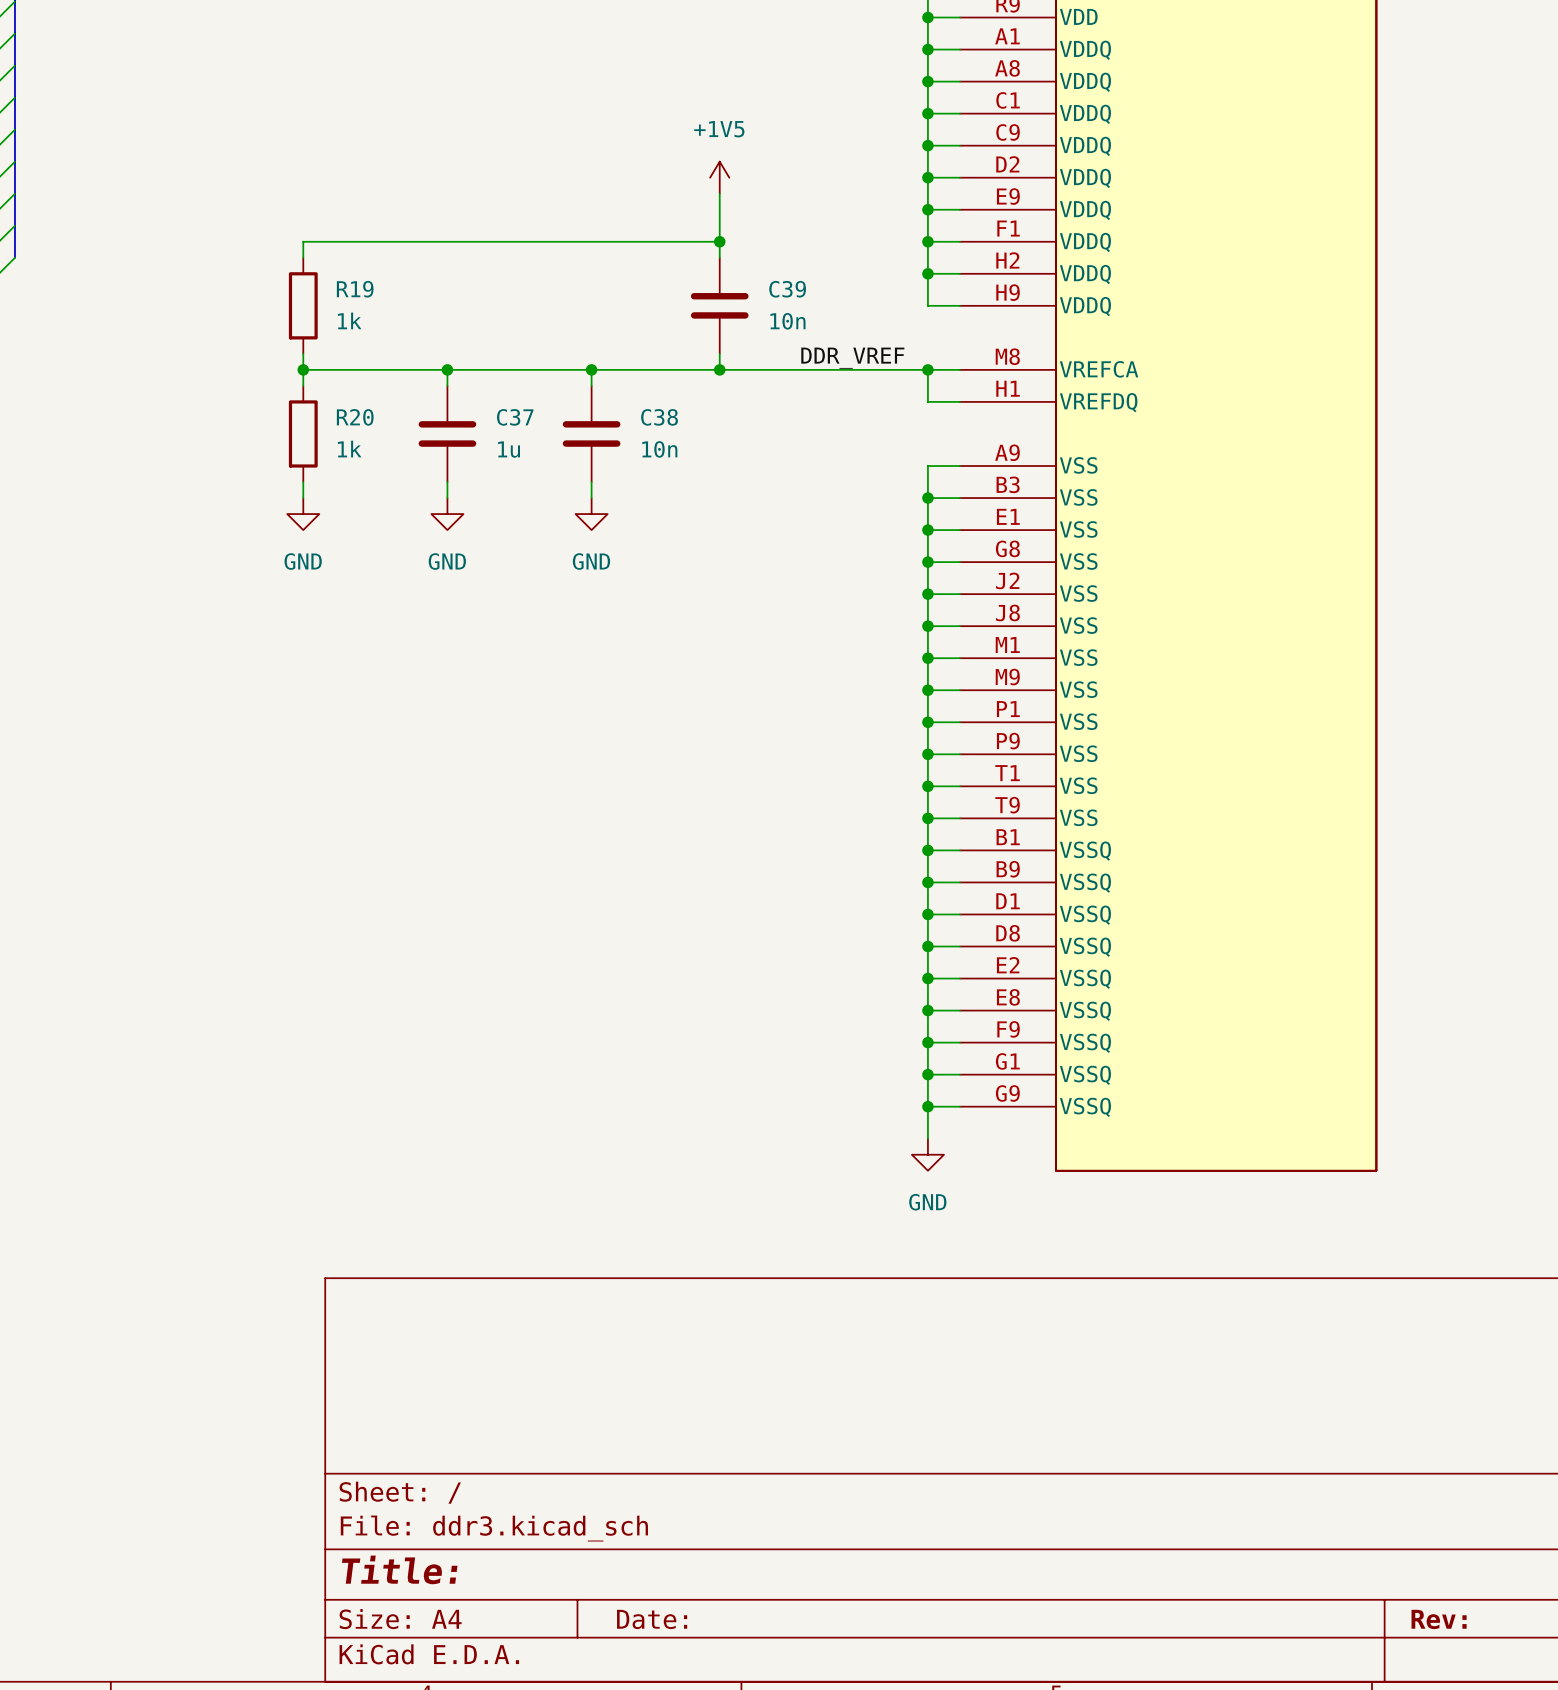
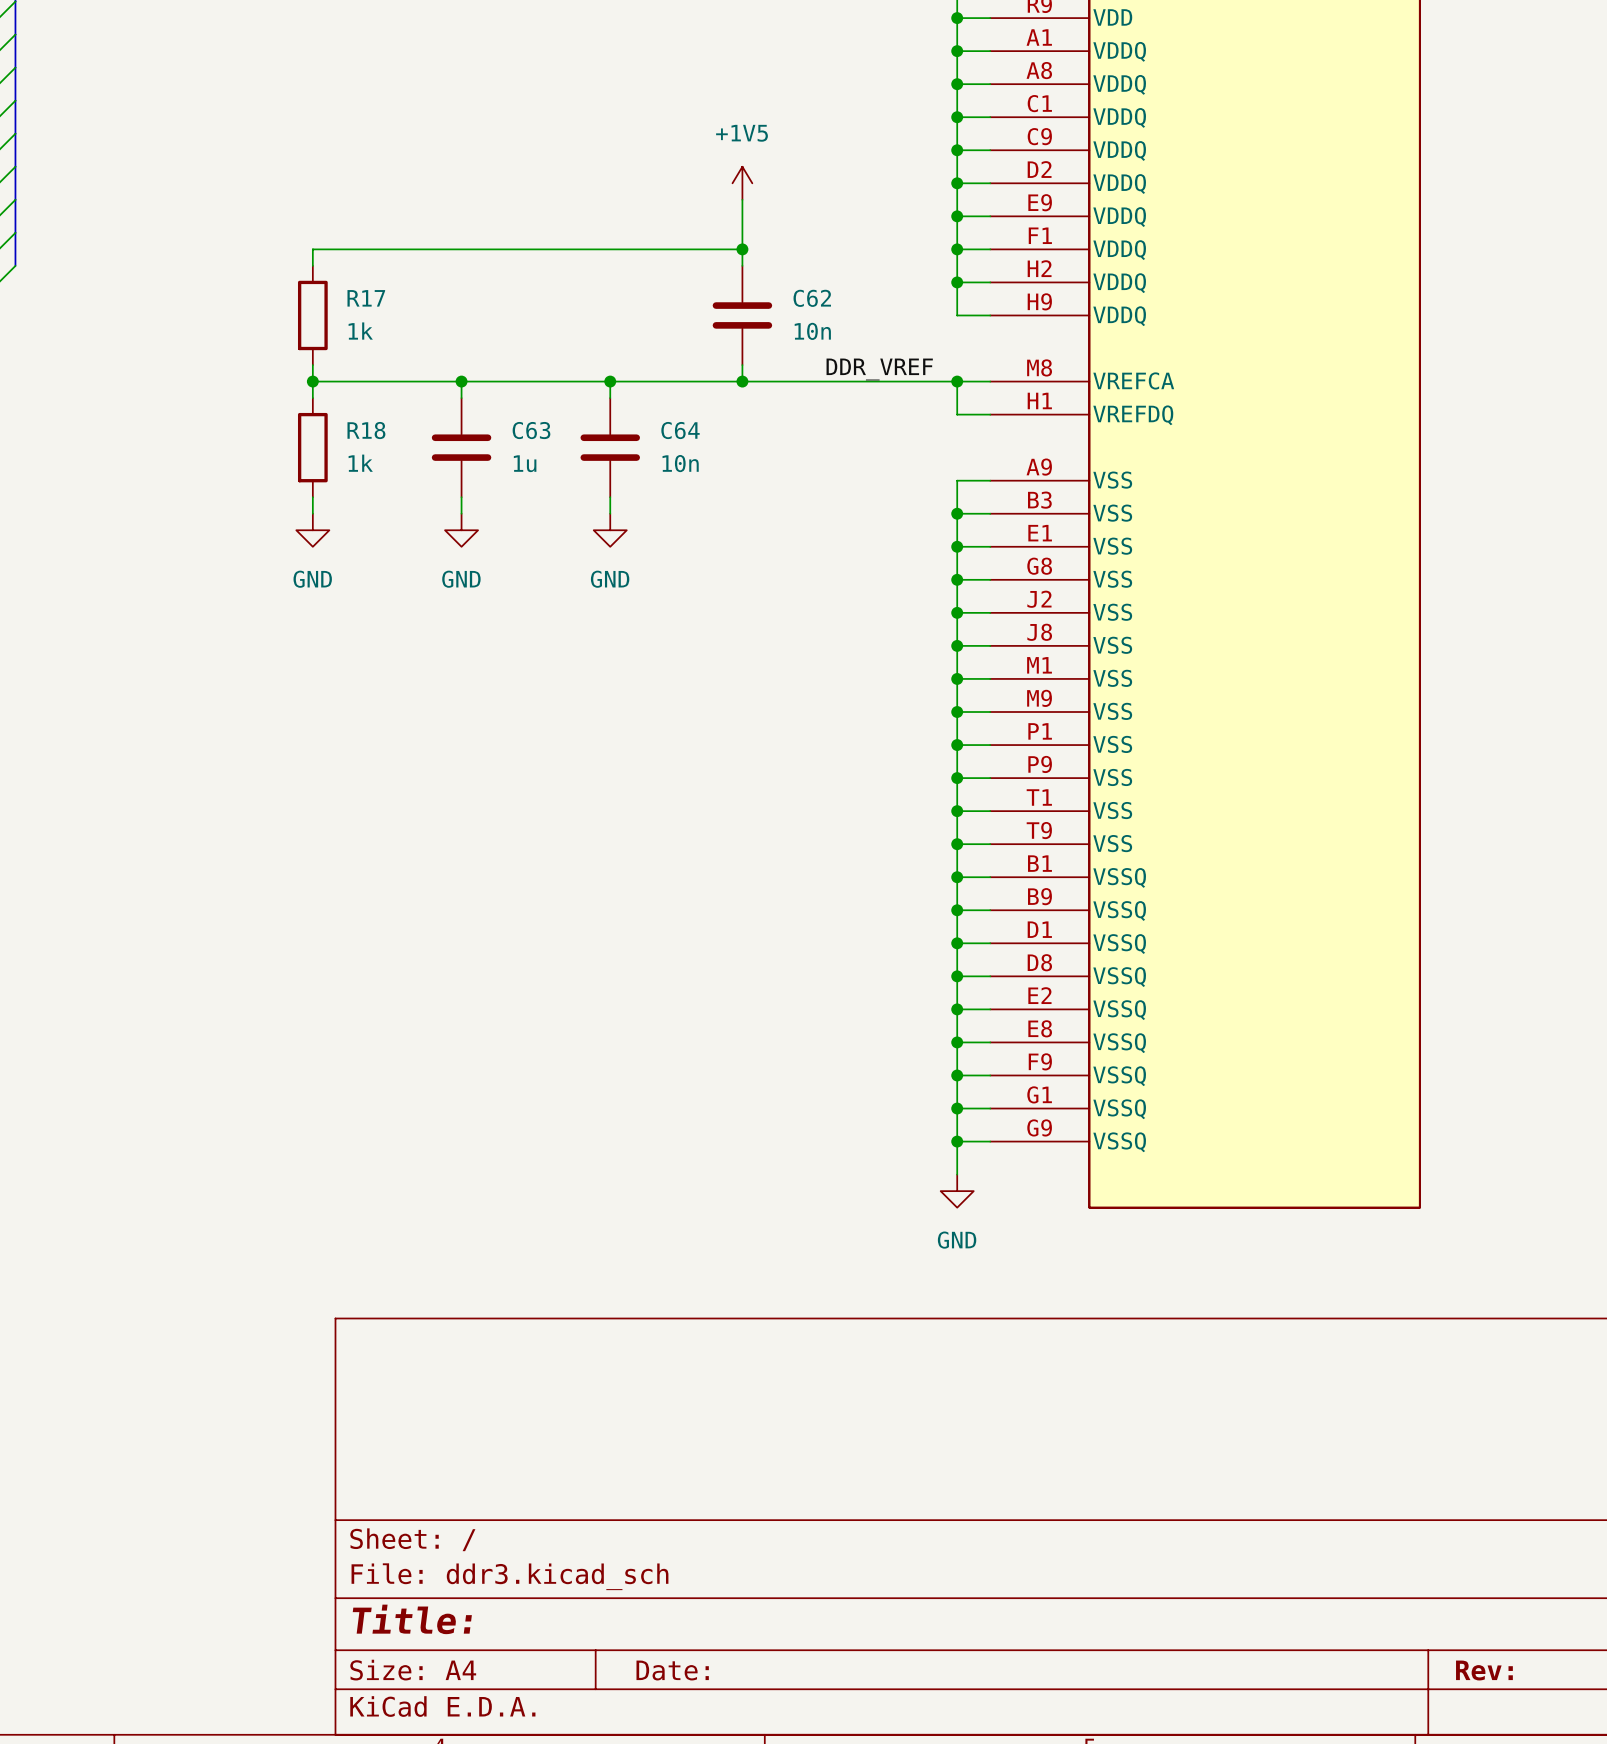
R19 name: R19 (355, 289) -> R17 (366, 298)
C39 name: C39 (787, 289) -> C62 (812, 298)
R20 name: R20 (355, 417) -> R18 (366, 430)
C37 name: C37 (515, 417) -> C63 (531, 430)
C38 name: C38 (659, 417) -> C64 (680, 430)

